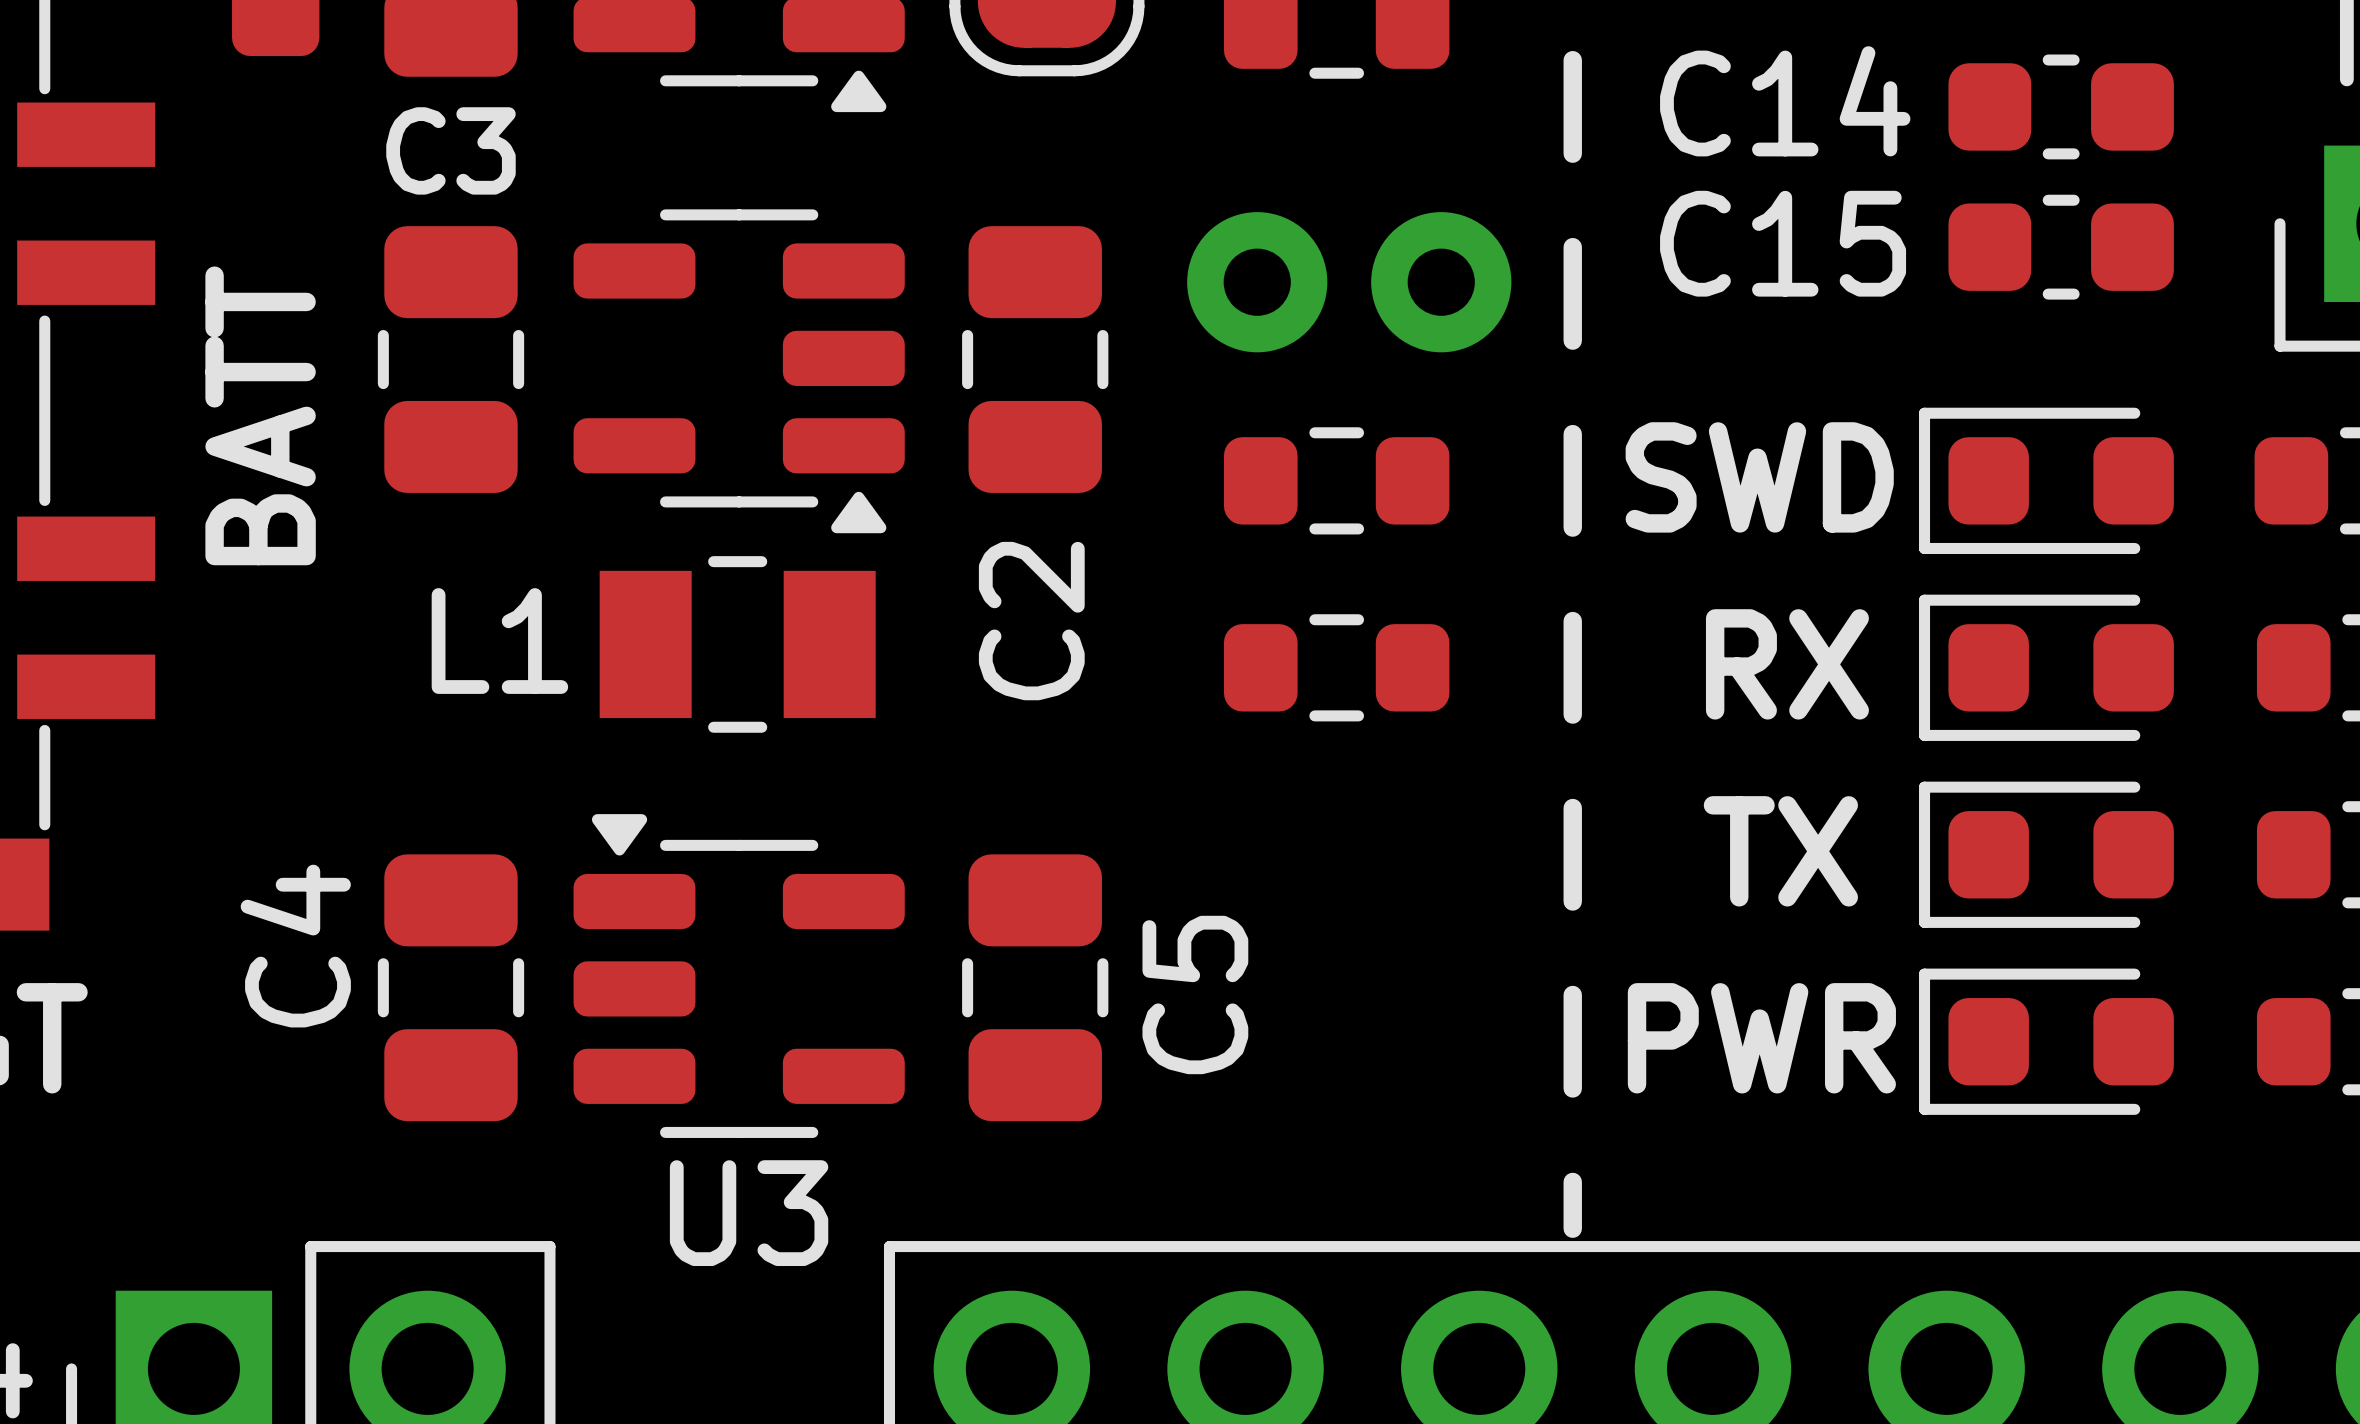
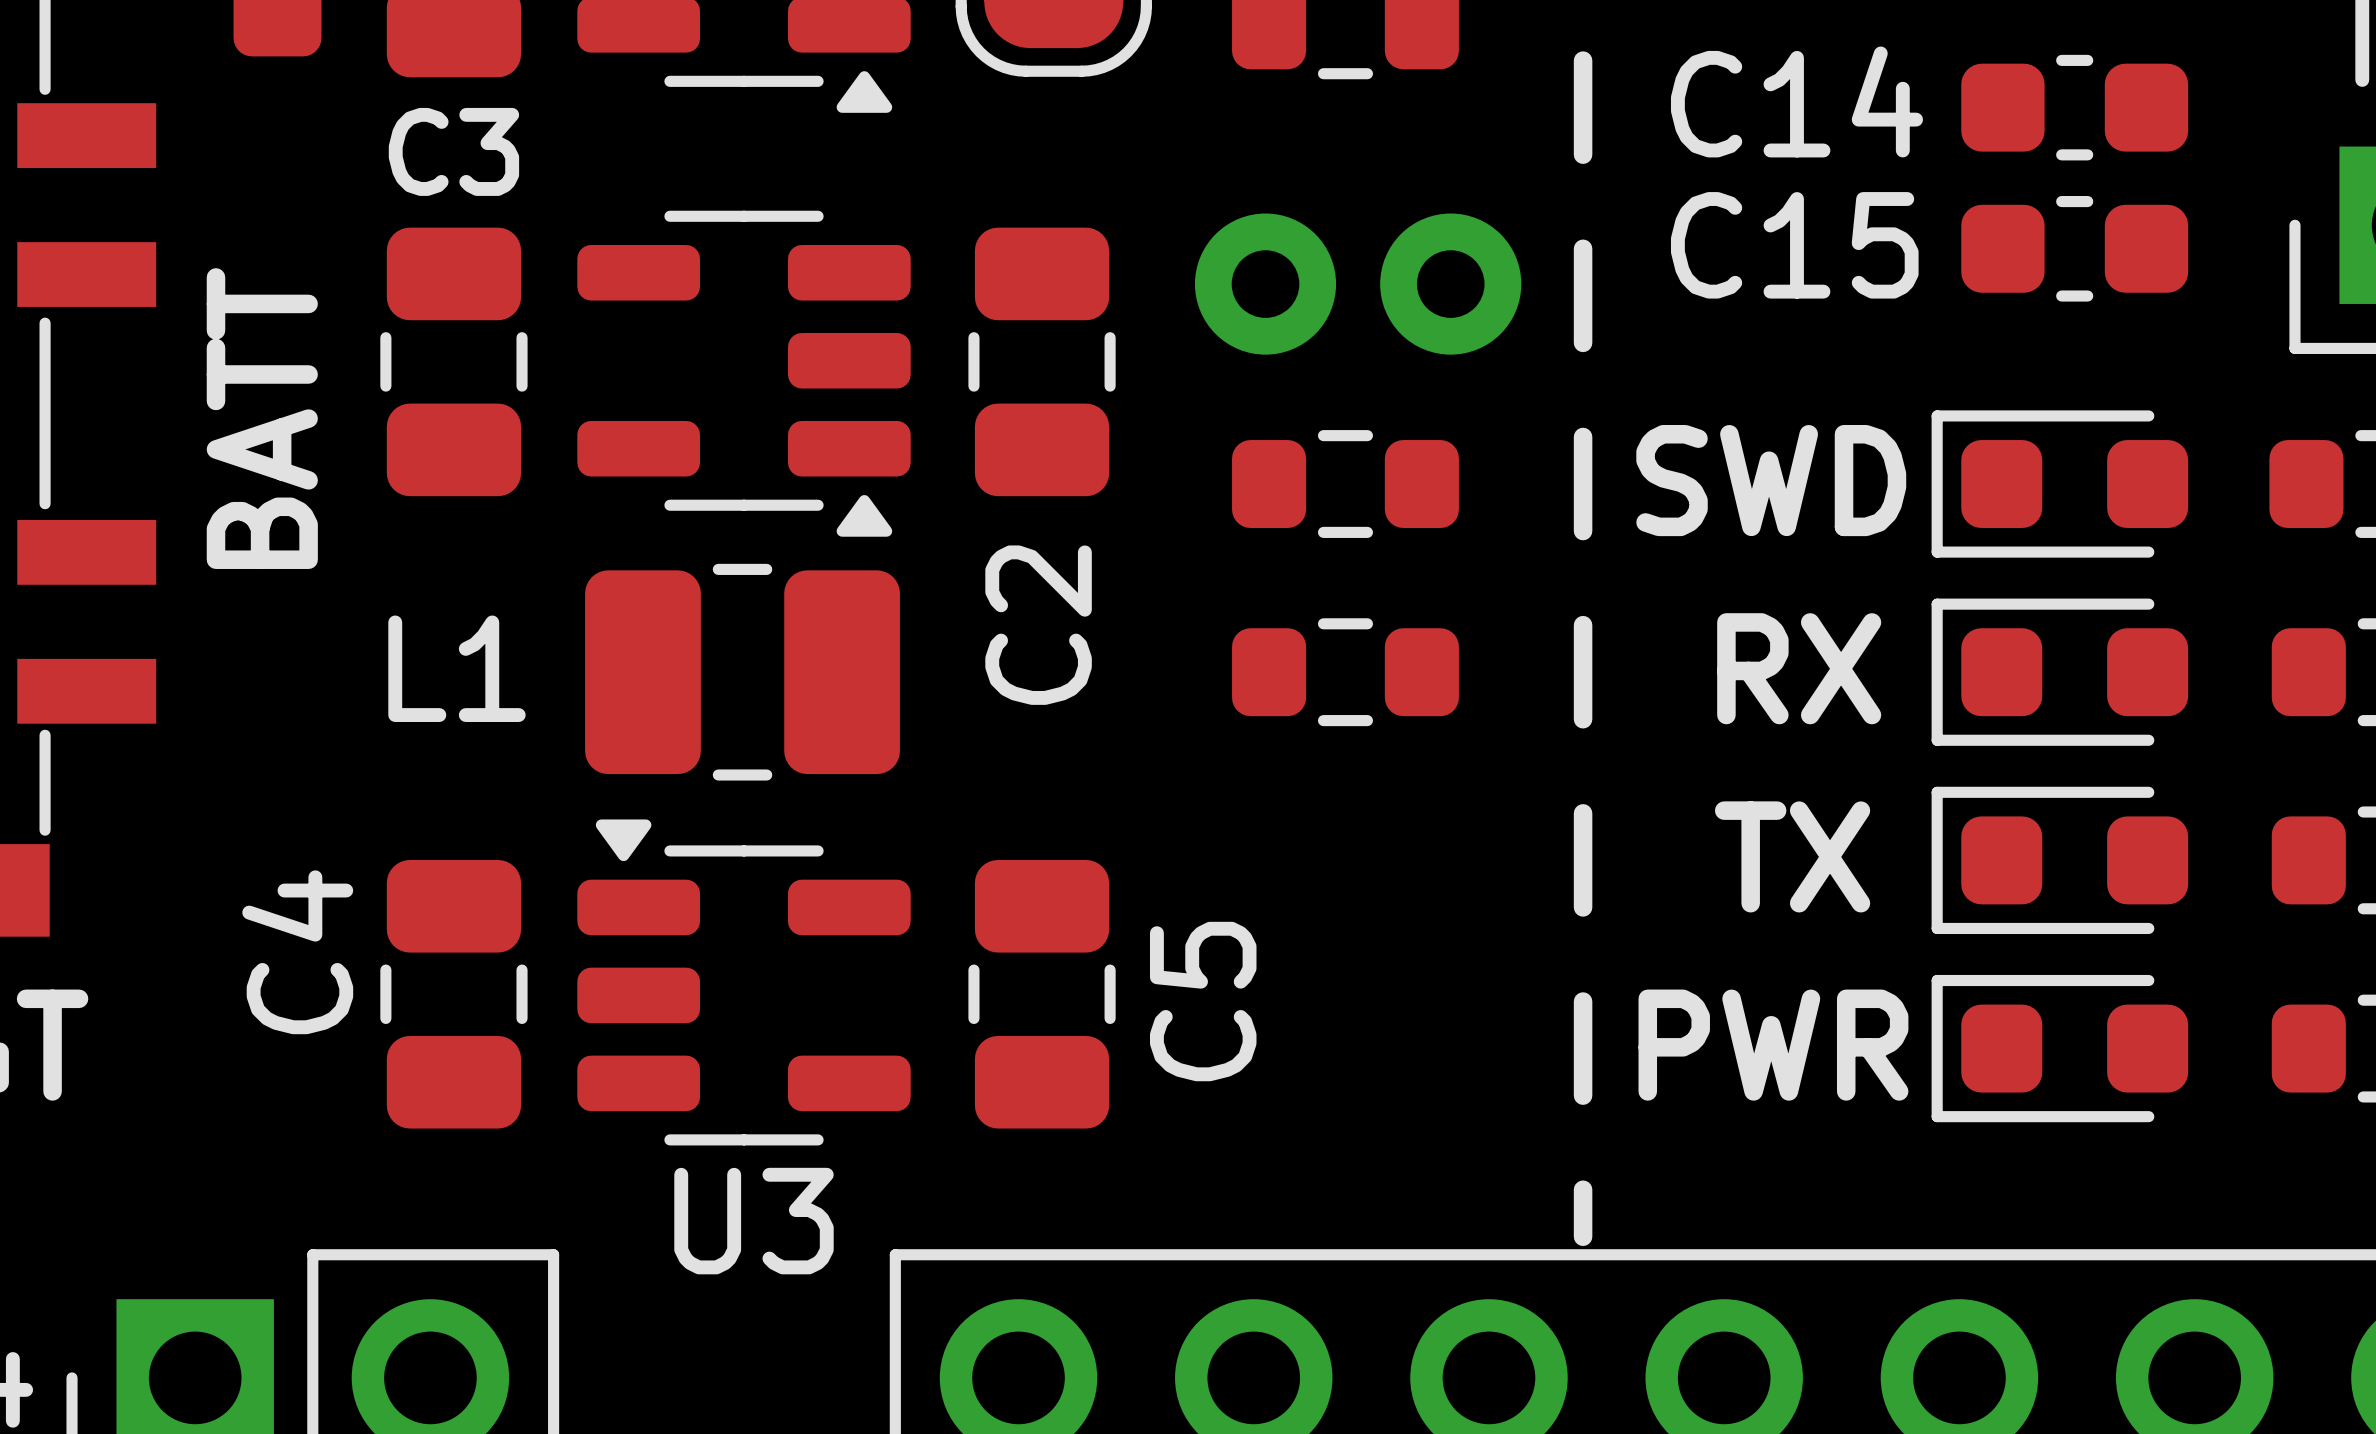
L1 footprint: [599, 556, 876, 733] -> [585, 563, 900, 781]
L1 name position: L1 (499, 641) -> L1 (456, 668)

